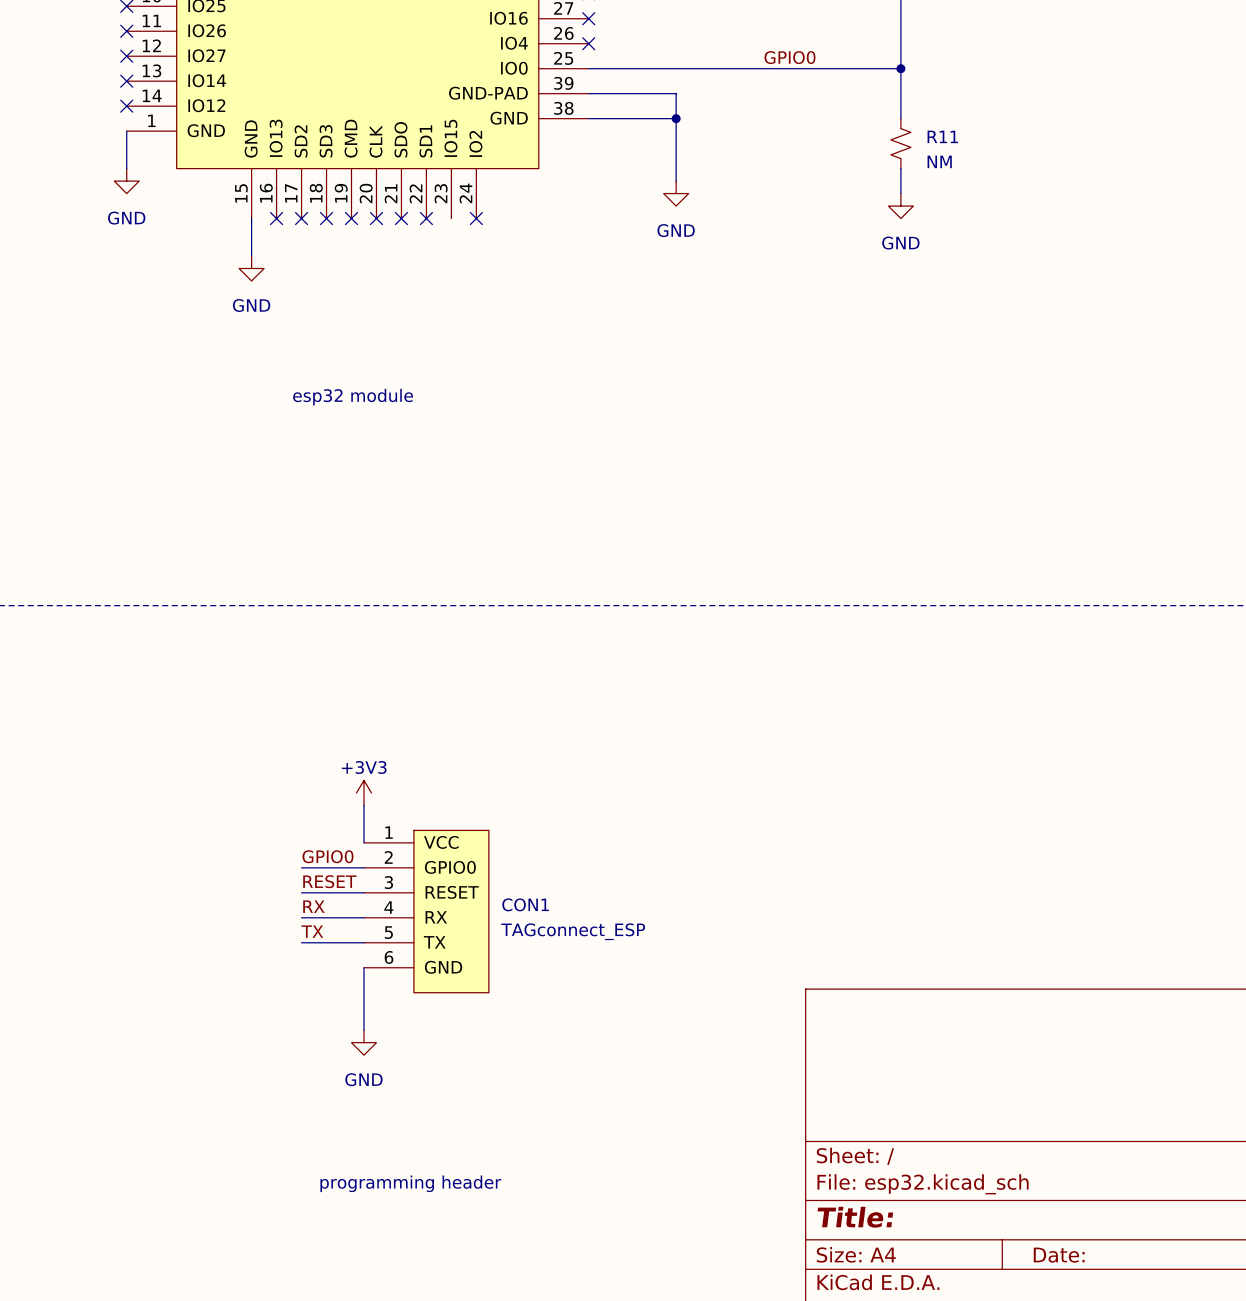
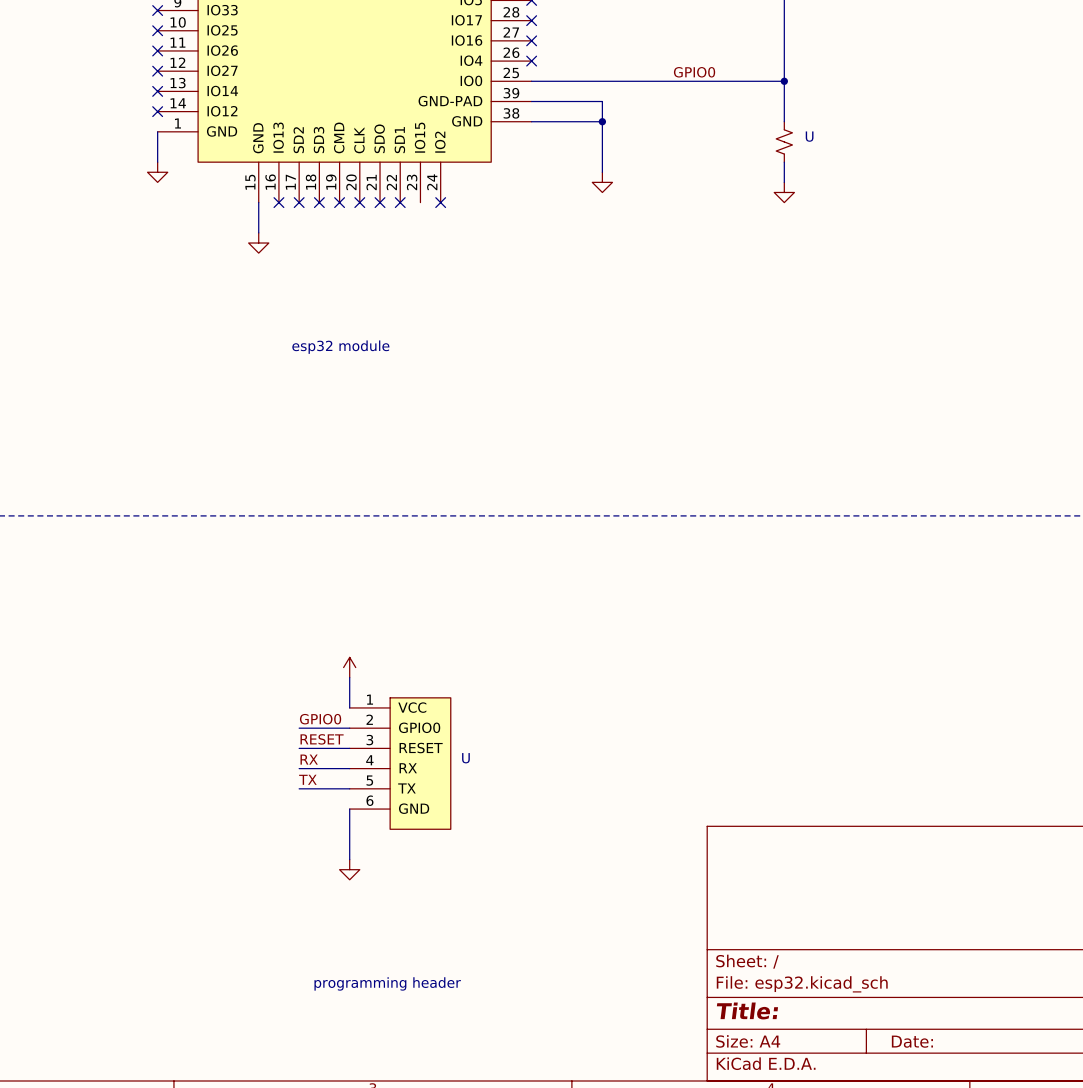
R11 name: R11 (942, 136) -> U (809, 136)
R11 value: NM (939, 161) -> none
power symbol text: GND (126, 218) -> none
power symbol text: GND (676, 230) -> none
power symbol text: GND (900, 243) -> none
power symbol text: GND (251, 305) -> none
power symbol text: +3V3 (364, 767) -> none
CON1 name: CON1 (525, 904) -> U (465, 758)
CON1 value: TAGconnect_ESP (573, 931) -> none
power symbol text: GND (363, 1079) -> none

